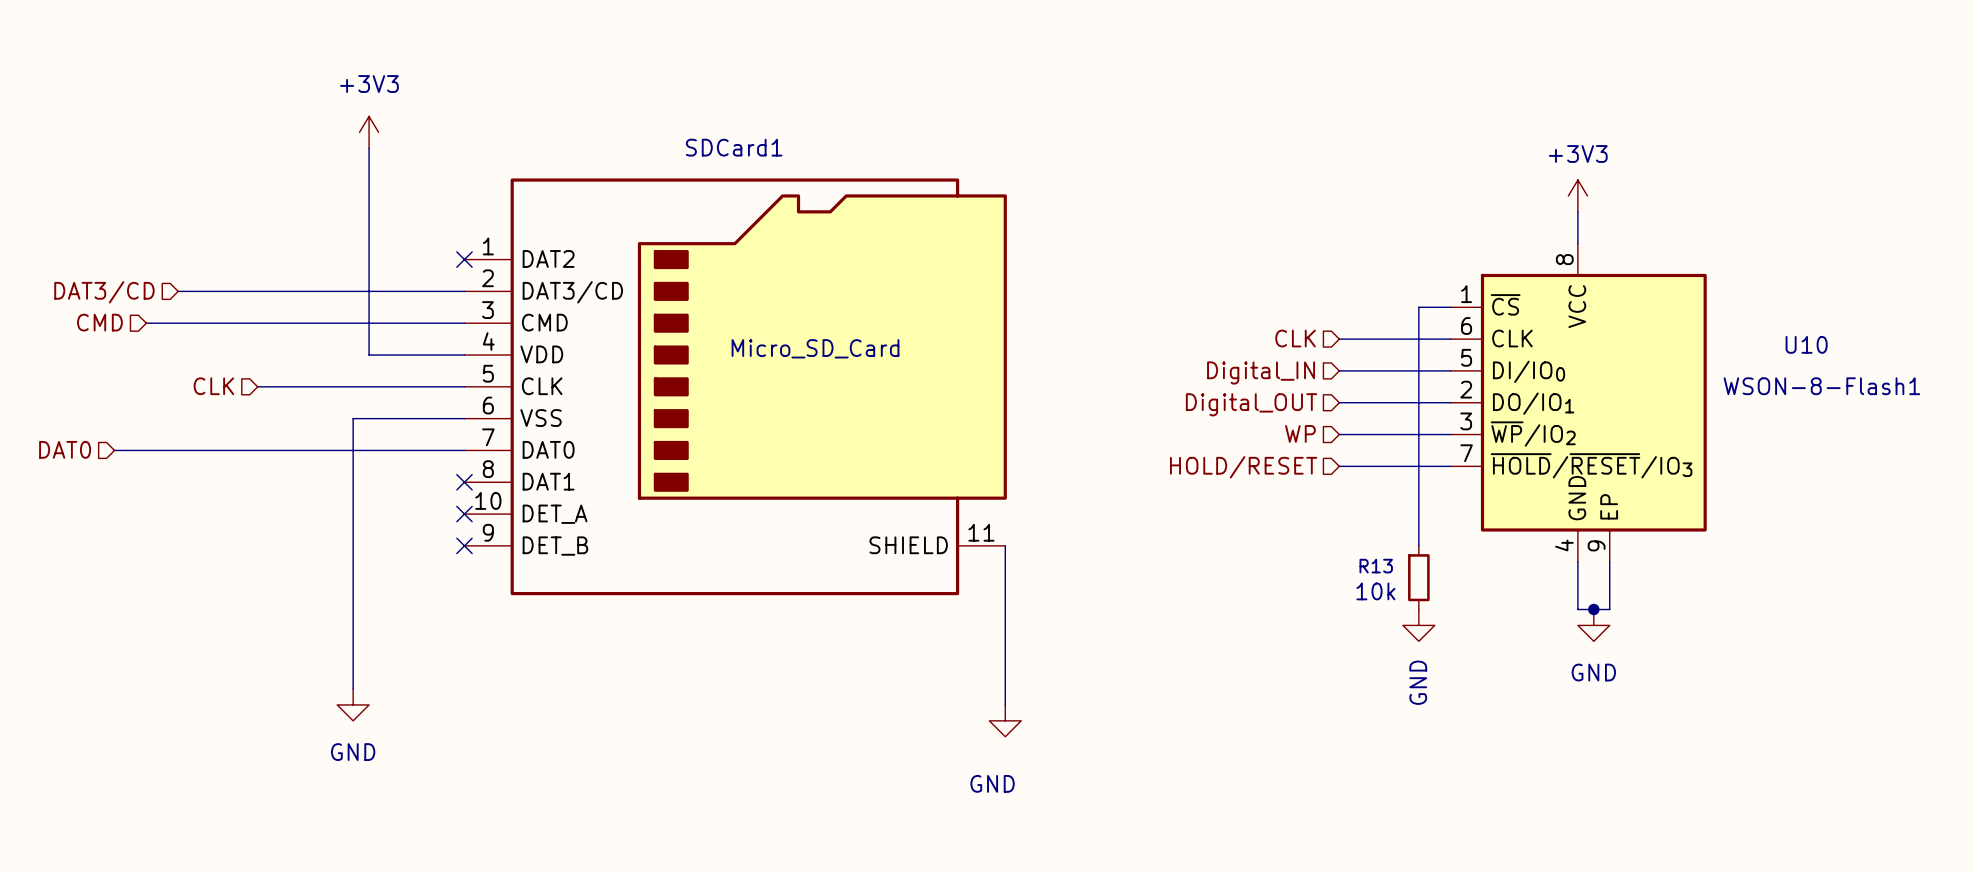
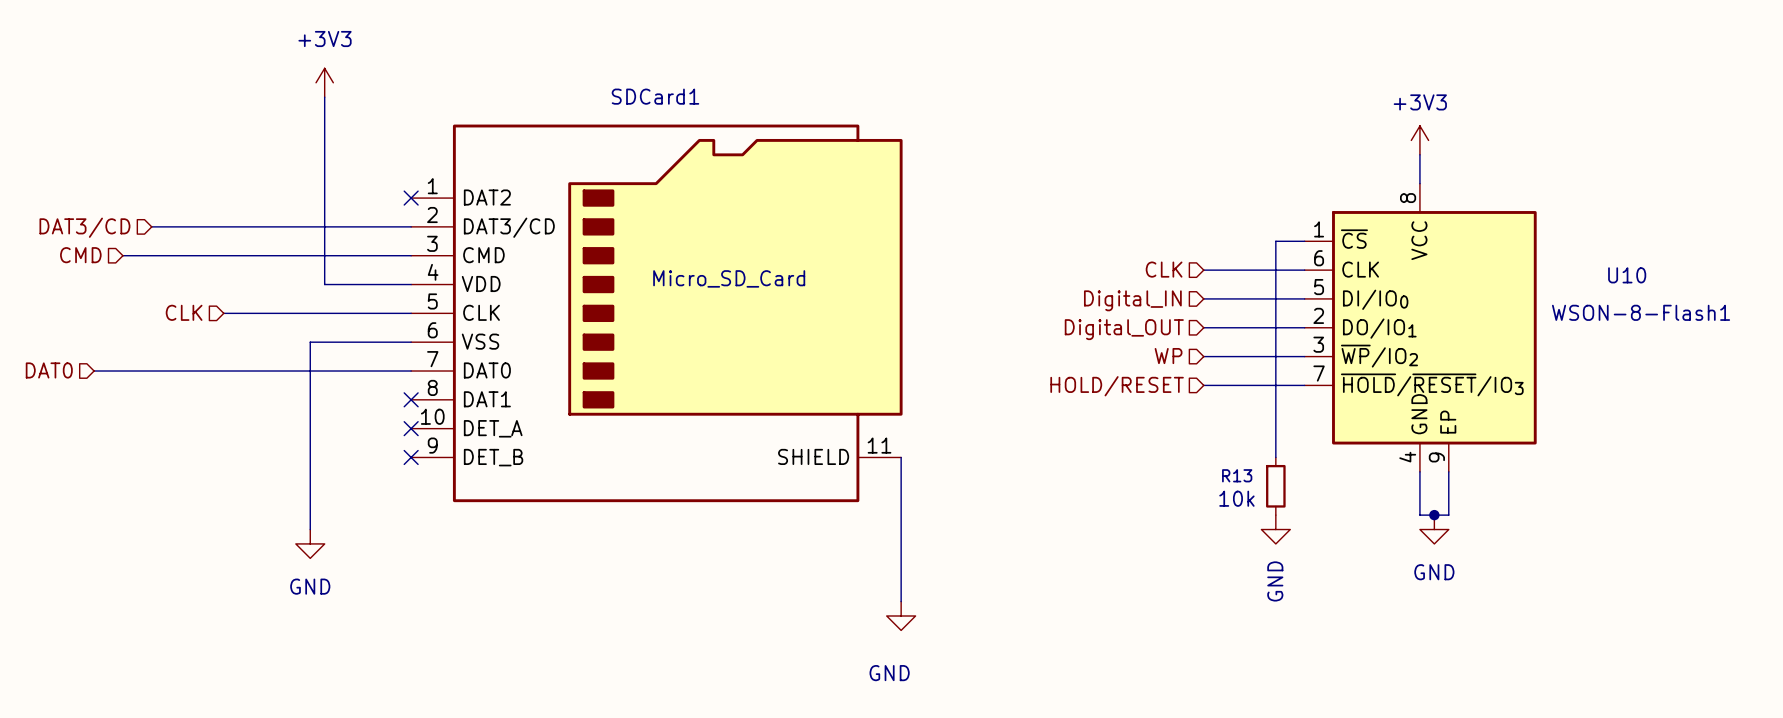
wire: (353, 625) (353, 689) -> none
power symbol position: GND (353, 704) -> GND (310, 543)

